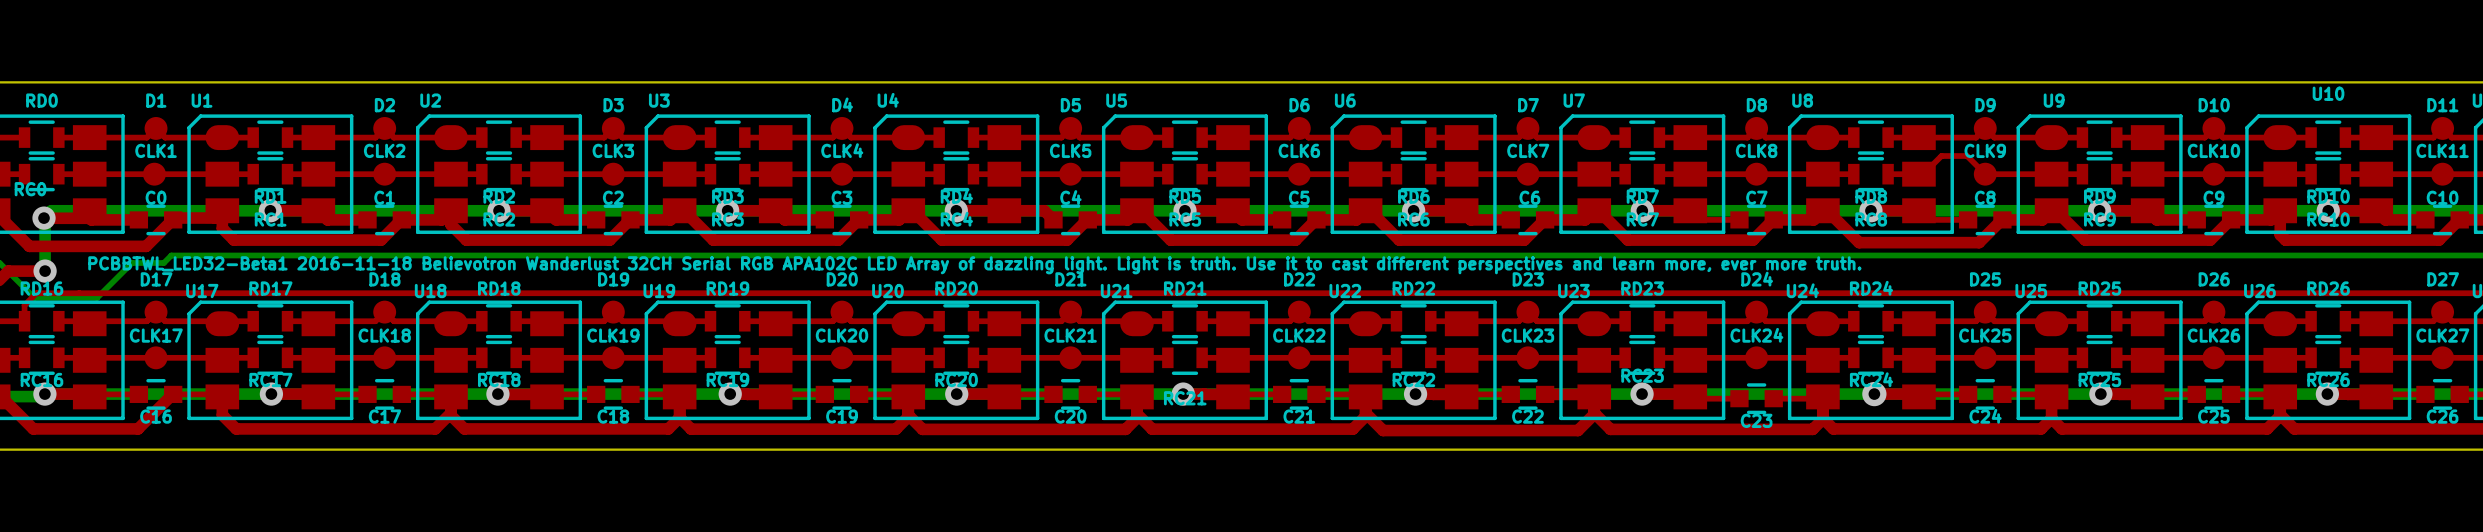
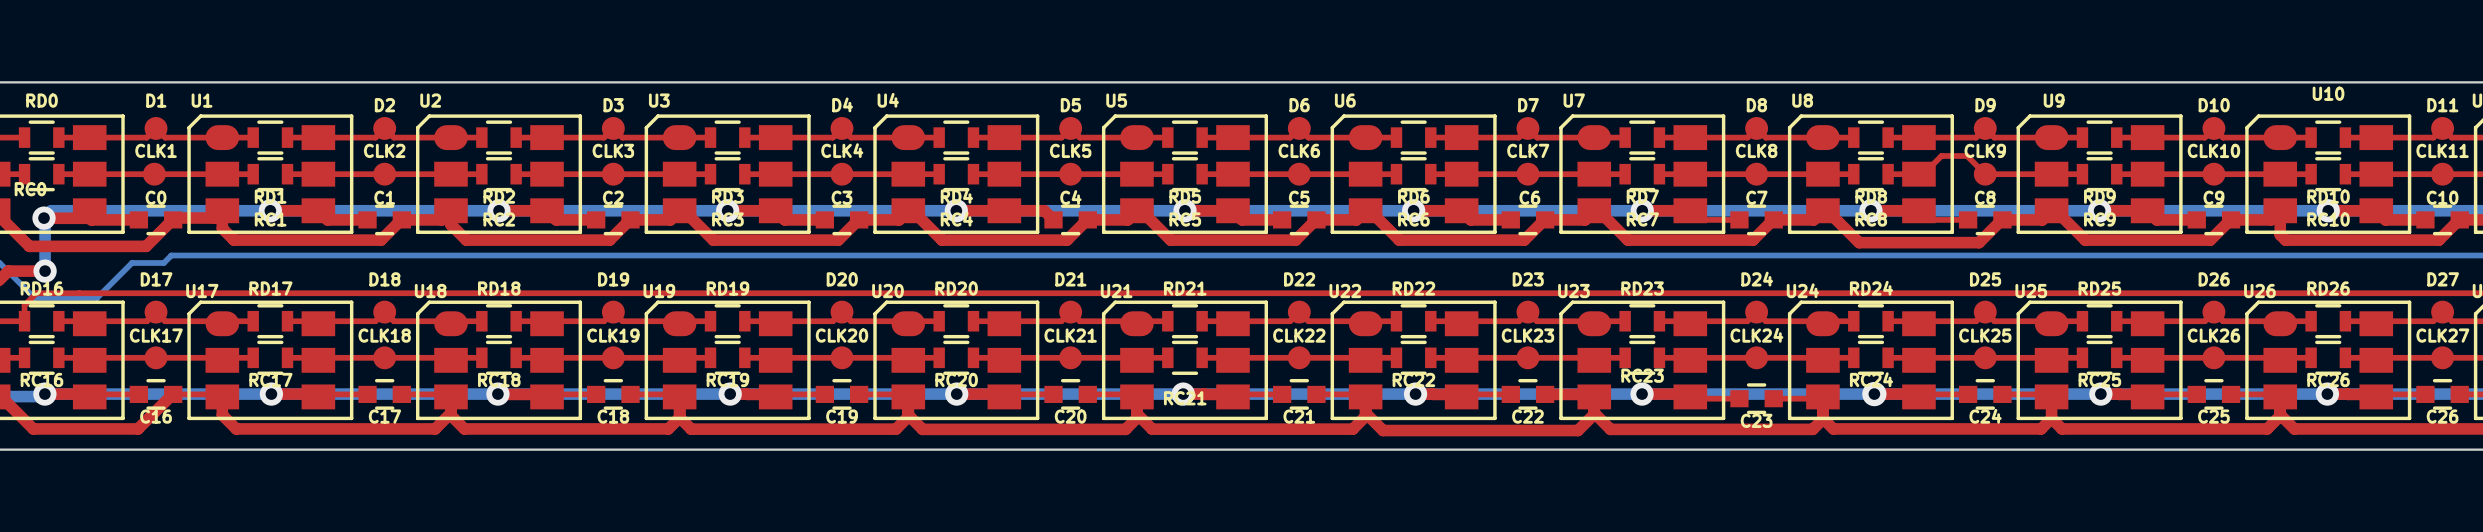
text: PCBBTWL_LED32-Beta1 2016-11-18 Believotron Wanderlust 32CH Serial RGB APA102C LED Array of dazzling light. Light is truth. Use it to cast different perspectives and learn more, ever more truth. (974, 265) -> none

